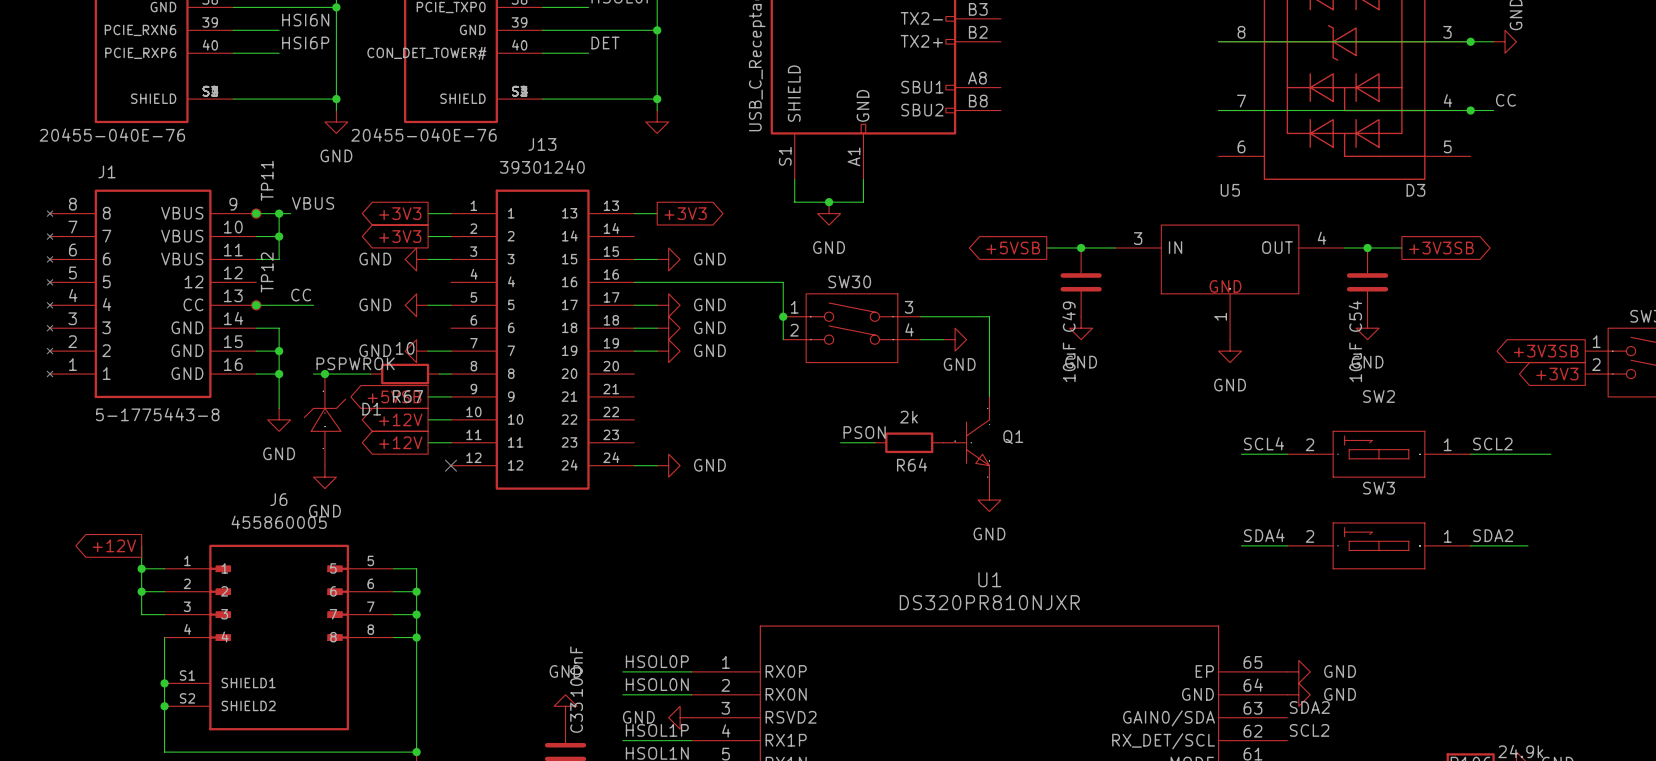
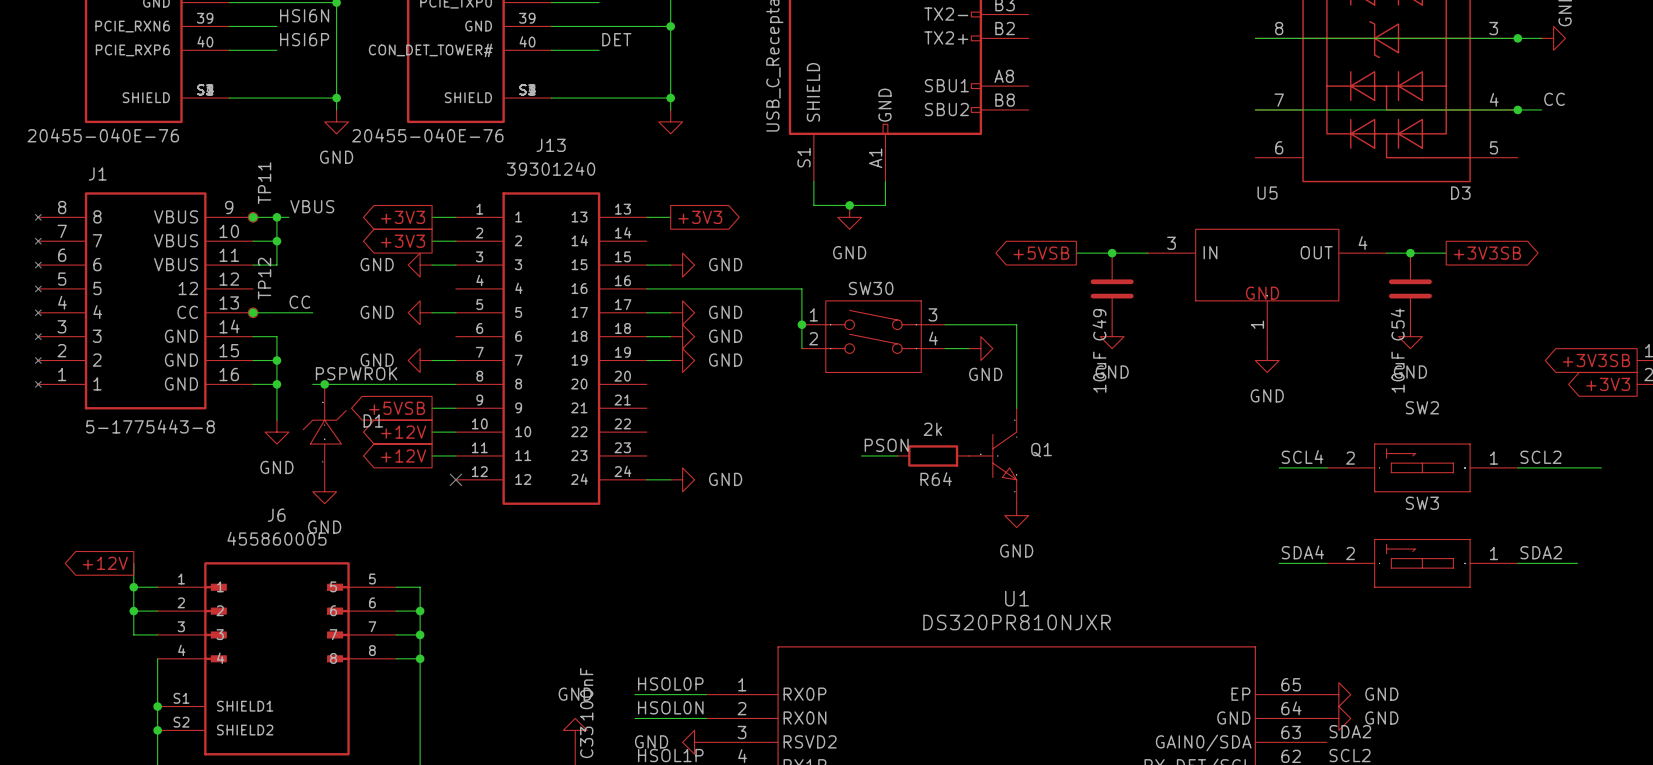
wire: none -> (372, 384) (443, 384)
R67: 10 (405, 374) -> none

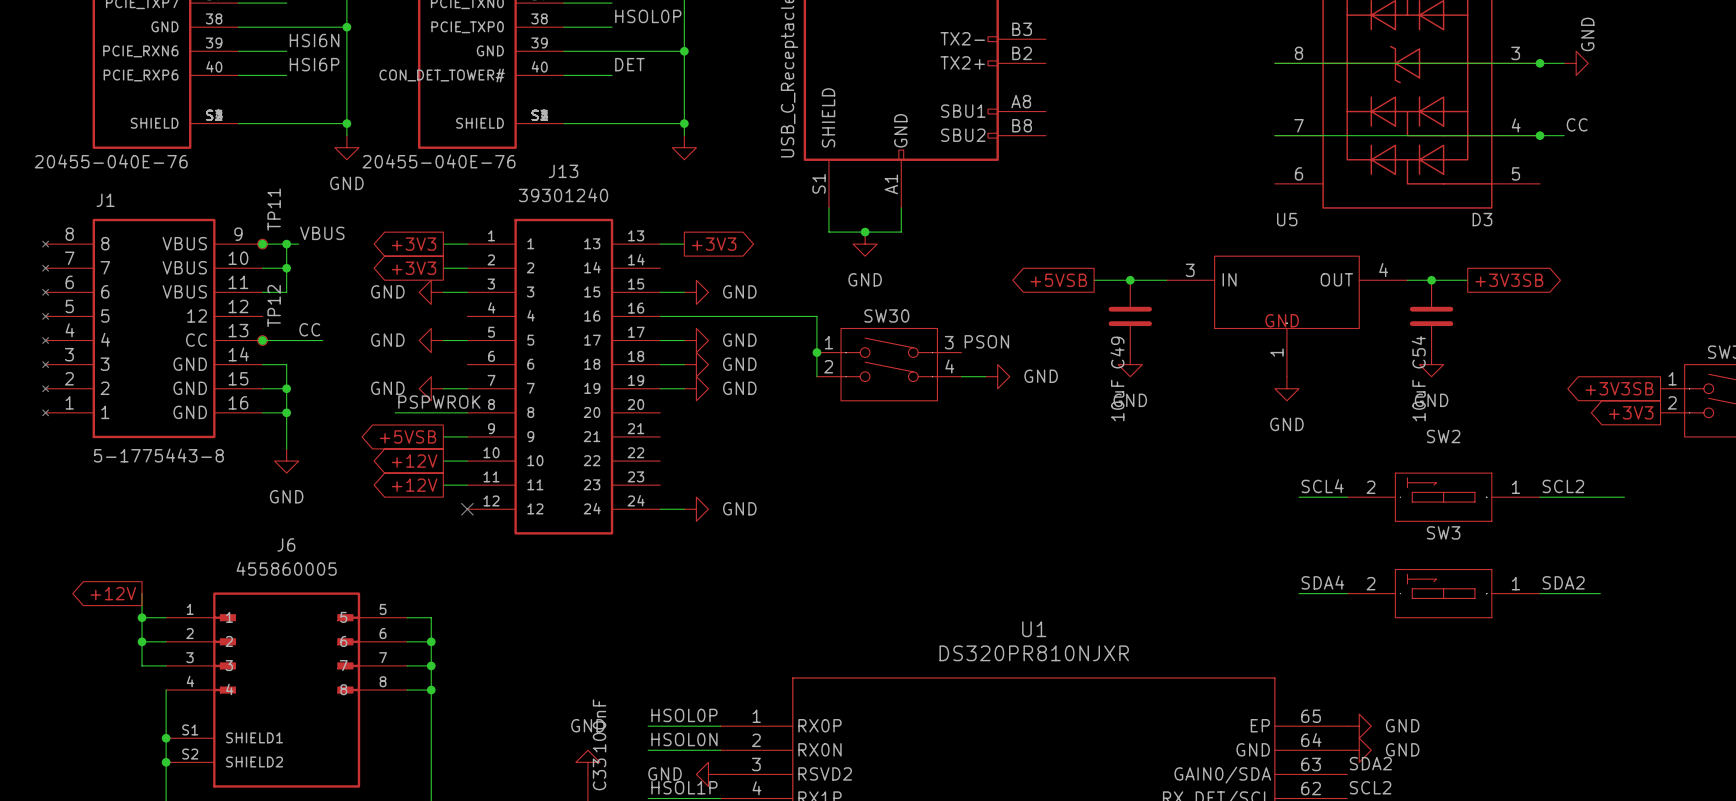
wire: (945, 324) (1016, 324) (1016, 408) -> none
label position: PSPWROK (356, 373) -> PSPWROK (439, 402)
power symbol text position: GND (985, 374) -> GND (1041, 376)
wire: (312, 384) (384, 384) -> none
junction: (324, 384) -> none
D1: (324, 432) -> none
label position: PSON (886, 445) -> PSON (986, 341)
wire: (861, 455) (897, 455) -> none
R64: 2k (933, 455) -> none
Q1: (992, 455) -> none
power symbol: GND (324, 491) -> none
power symbol: GND (1016, 515) -> none

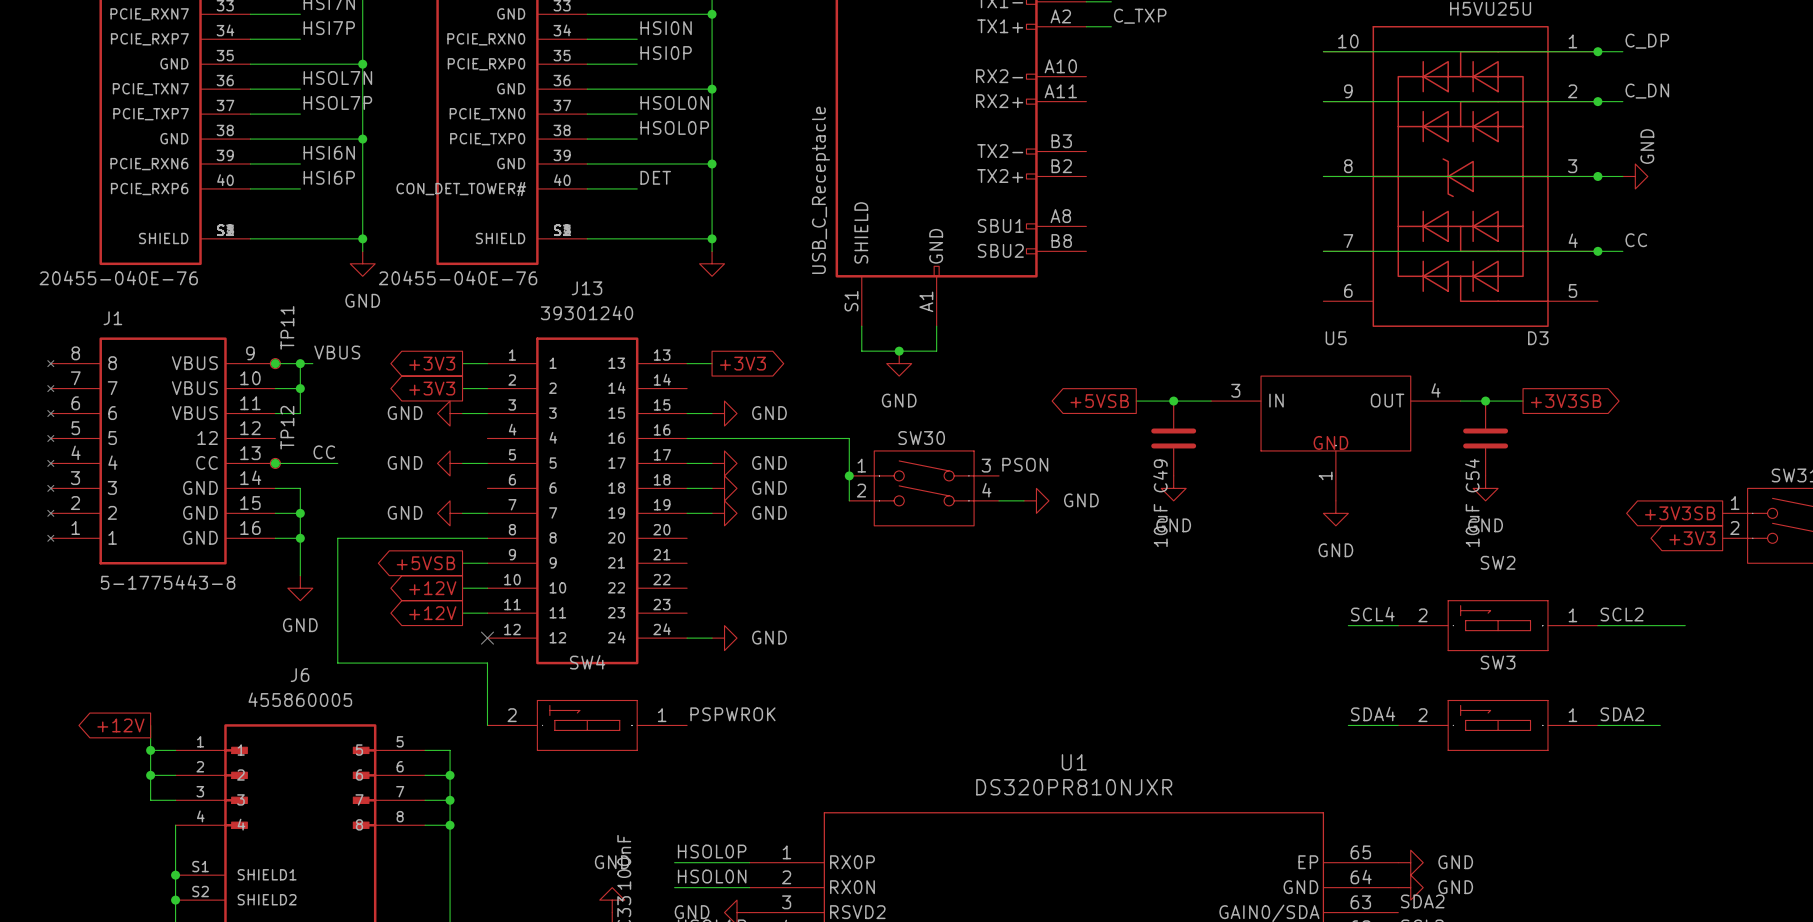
label: PSPWROK (439, 402) -> none
wire: none -> (412, 538) (337, 538) (337, 663) (487, 663) (487, 725)
label: none -> PSPWROK (732, 714)
SW4: none -> (587, 725)

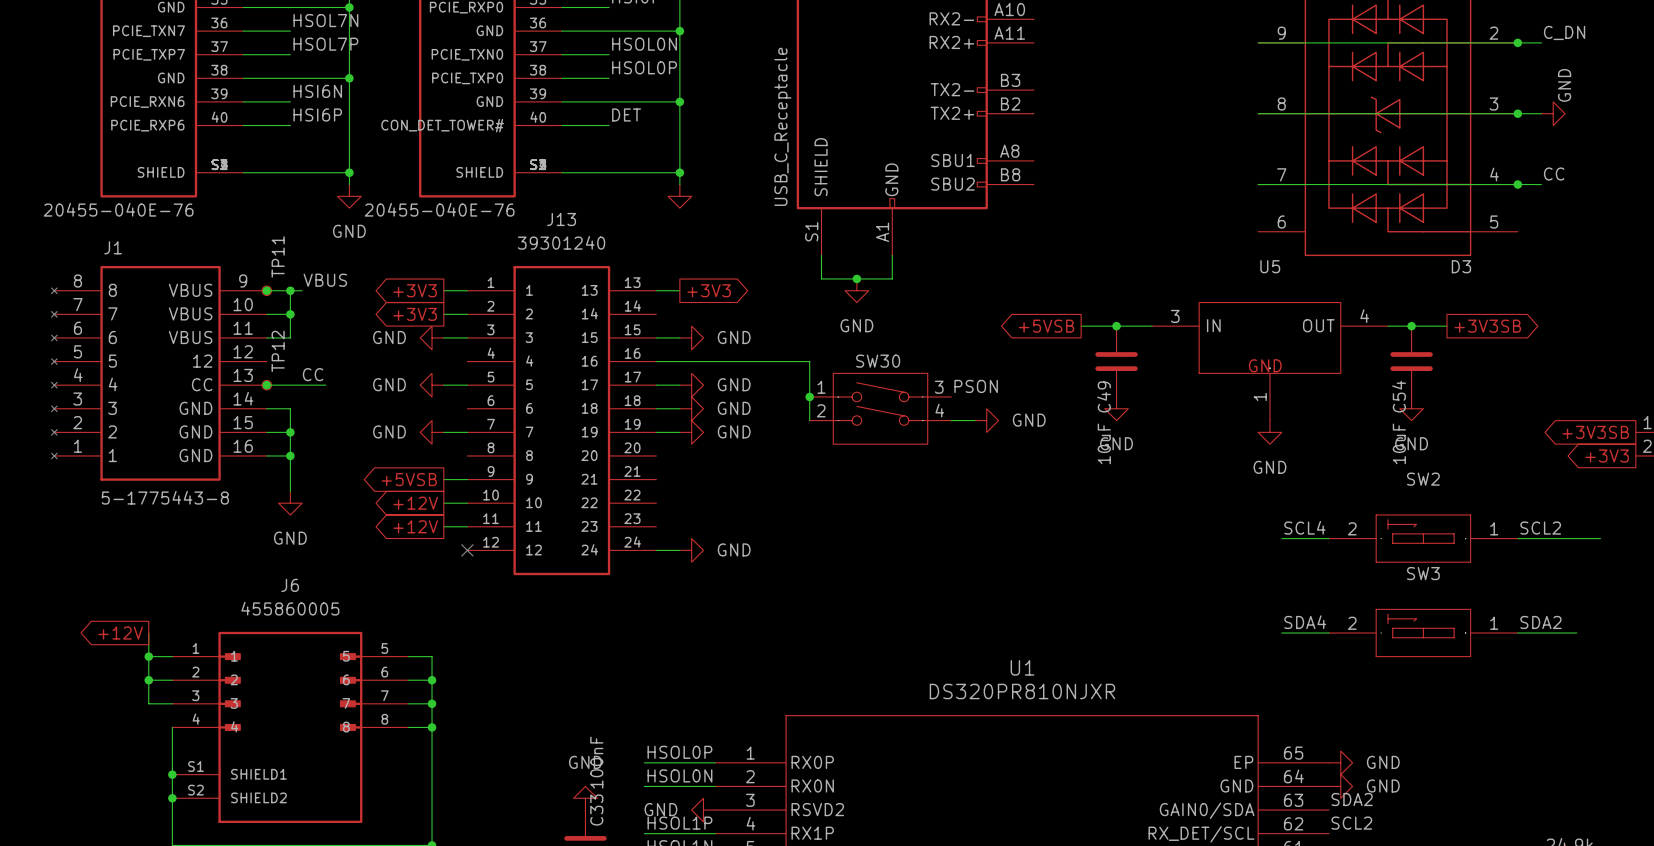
wire: (487, 538) (337, 538) (337, 663) (487, 663) (487, 725) -> none
label: PSPWROK (732, 714) -> none
SW4: (587, 725) -> none

